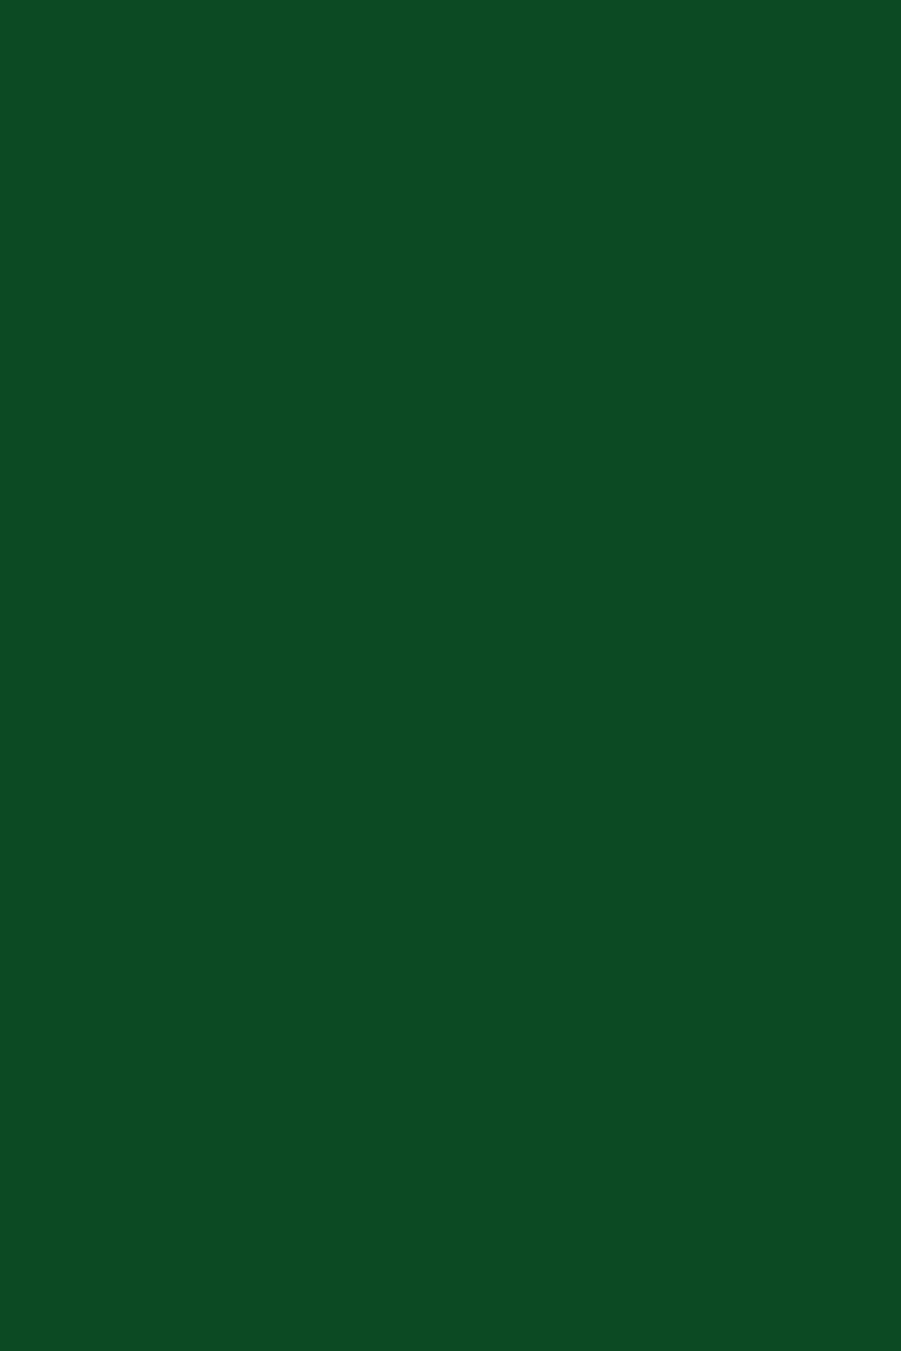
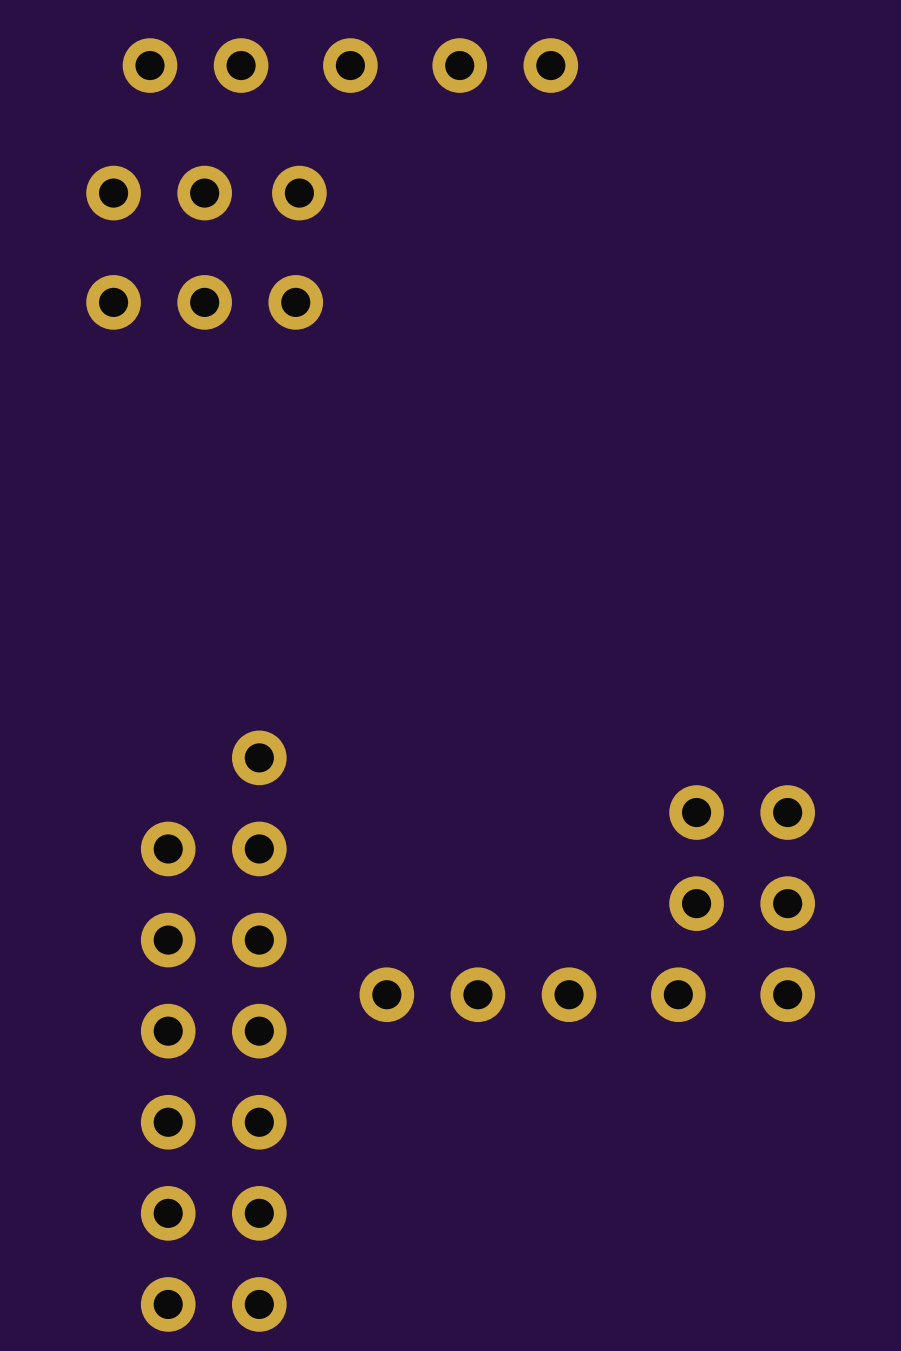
via: none -> (150, 65)
via: none -> (241, 65)
via: none -> (350, 65)
via: none -> (459, 65)
via: none -> (550, 65)
via: none -> (113, 193)
via: none -> (204, 193)
via: none -> (299, 193)
via: none -> (113, 302)
via: none -> (204, 302)
via: none -> (295, 302)
via: none -> (259, 757)
via: none -> (696, 812)
via: none -> (787, 812)
via: none -> (168, 848)
via: none -> (259, 848)
via: none -> (696, 903)
via: none -> (787, 903)
via: none -> (168, 940)
via: none -> (259, 940)
via: none -> (386, 994)
via: none -> (477, 994)
via: none -> (569, 994)
via: none -> (678, 994)
via: none -> (787, 994)
via: none -> (168, 1031)
via: none -> (259, 1031)
via: none -> (168, 1122)
via: none -> (259, 1122)
via: none -> (168, 1213)
via: none -> (259, 1213)
via: none -> (168, 1304)
via: none -> (259, 1304)

